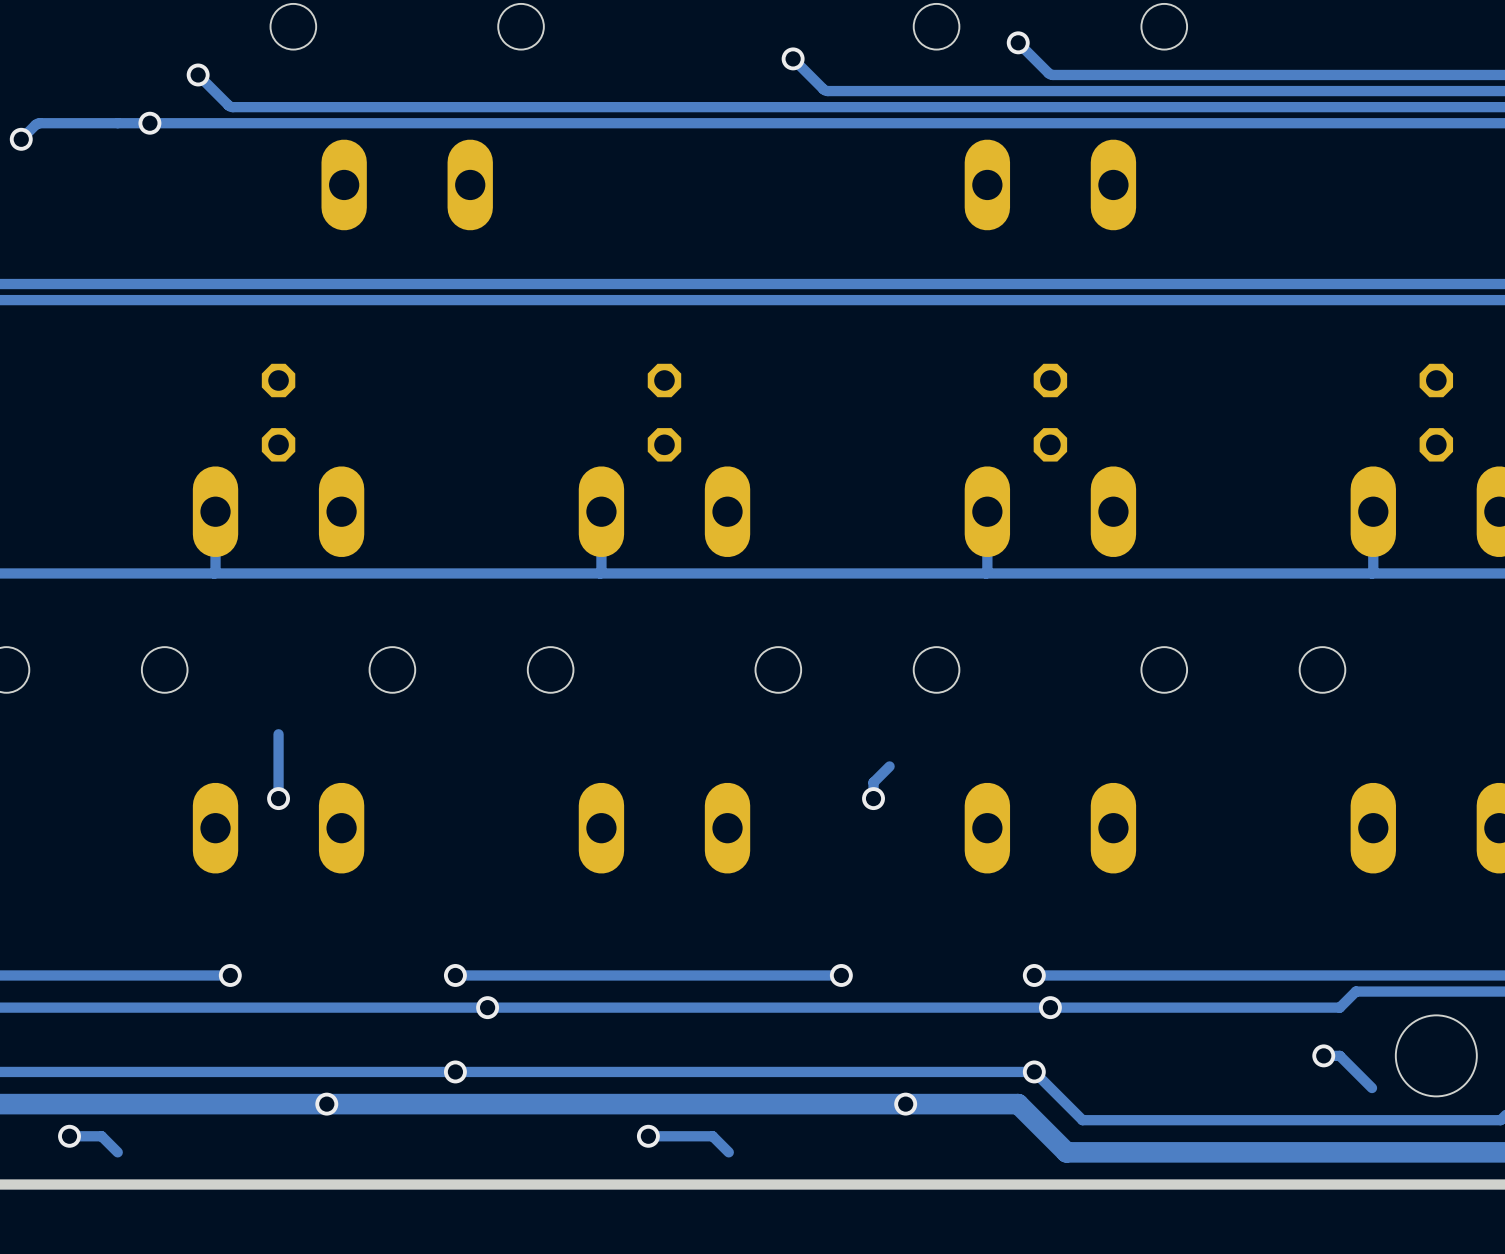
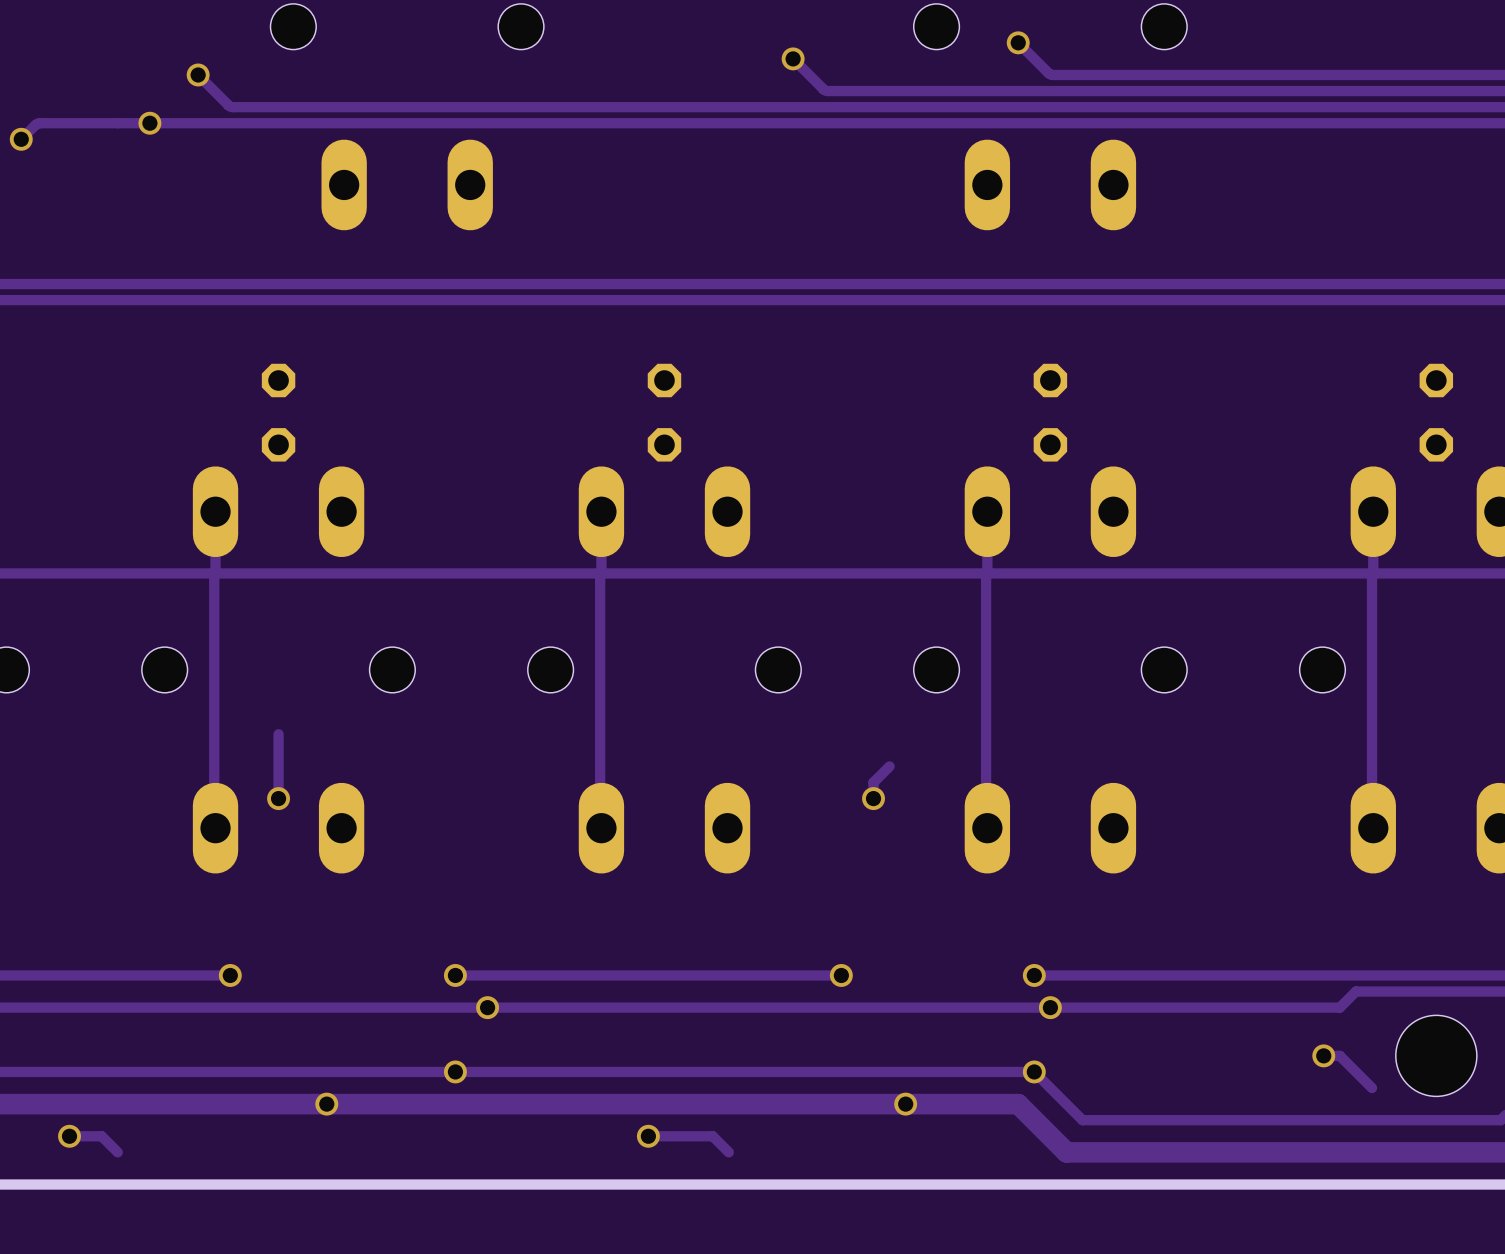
track: none -> (214, 573) (215, 828)
track: none -> (600, 573) (601, 828)
track: none -> (986, 573) (986, 830)
track: none -> (1372, 573) (1373, 828)

